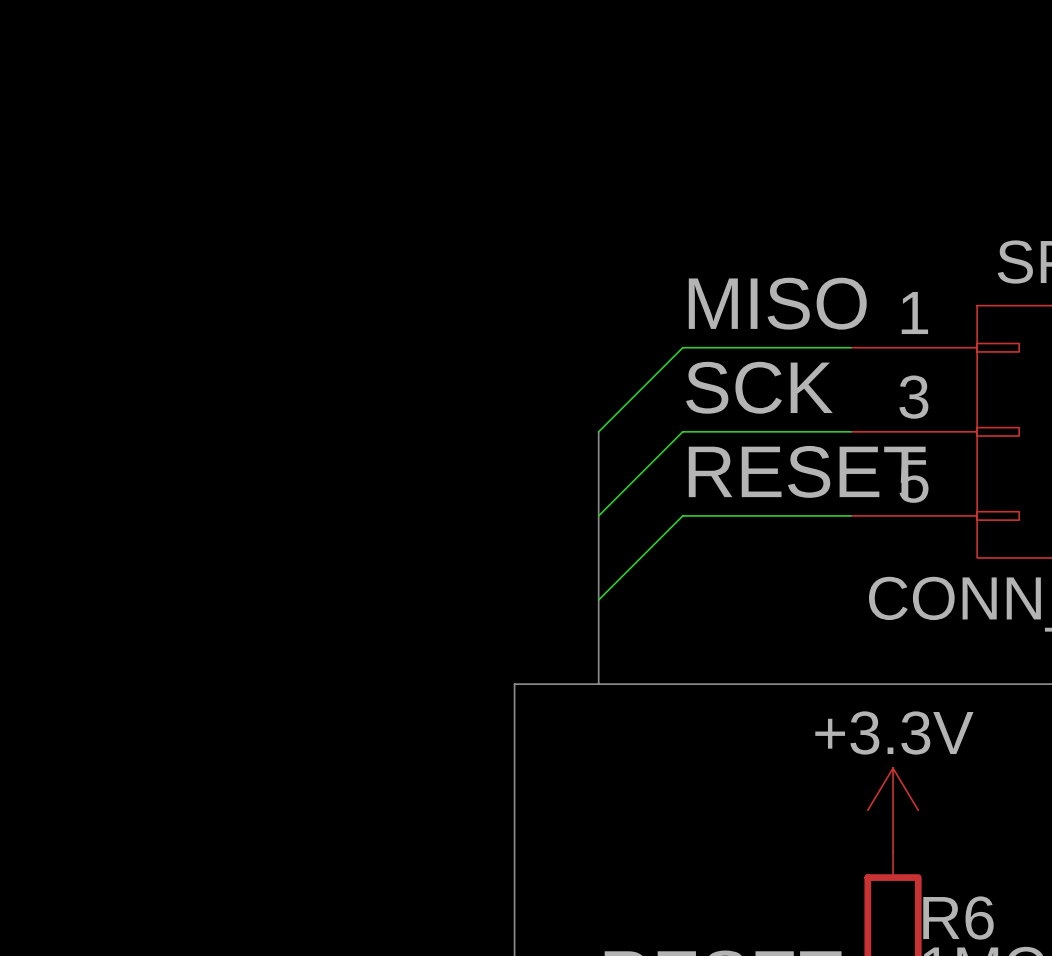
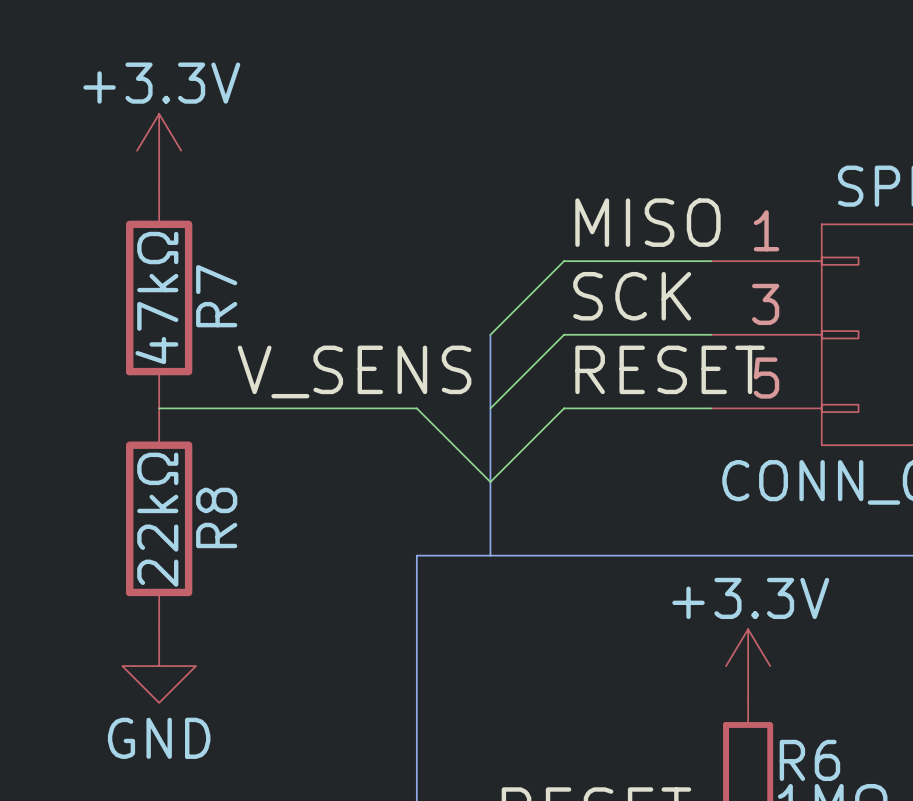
power symbol: none -> +3.3V (159, 150)
R7: none -> 47kΩ (159, 297)
label: none -> V_SENS (354, 371)
wire: none -> (159, 408) (416, 408) (490, 482)
R8: none -> 22kΩ (159, 518)
power symbol: none -> GND (159, 666)

